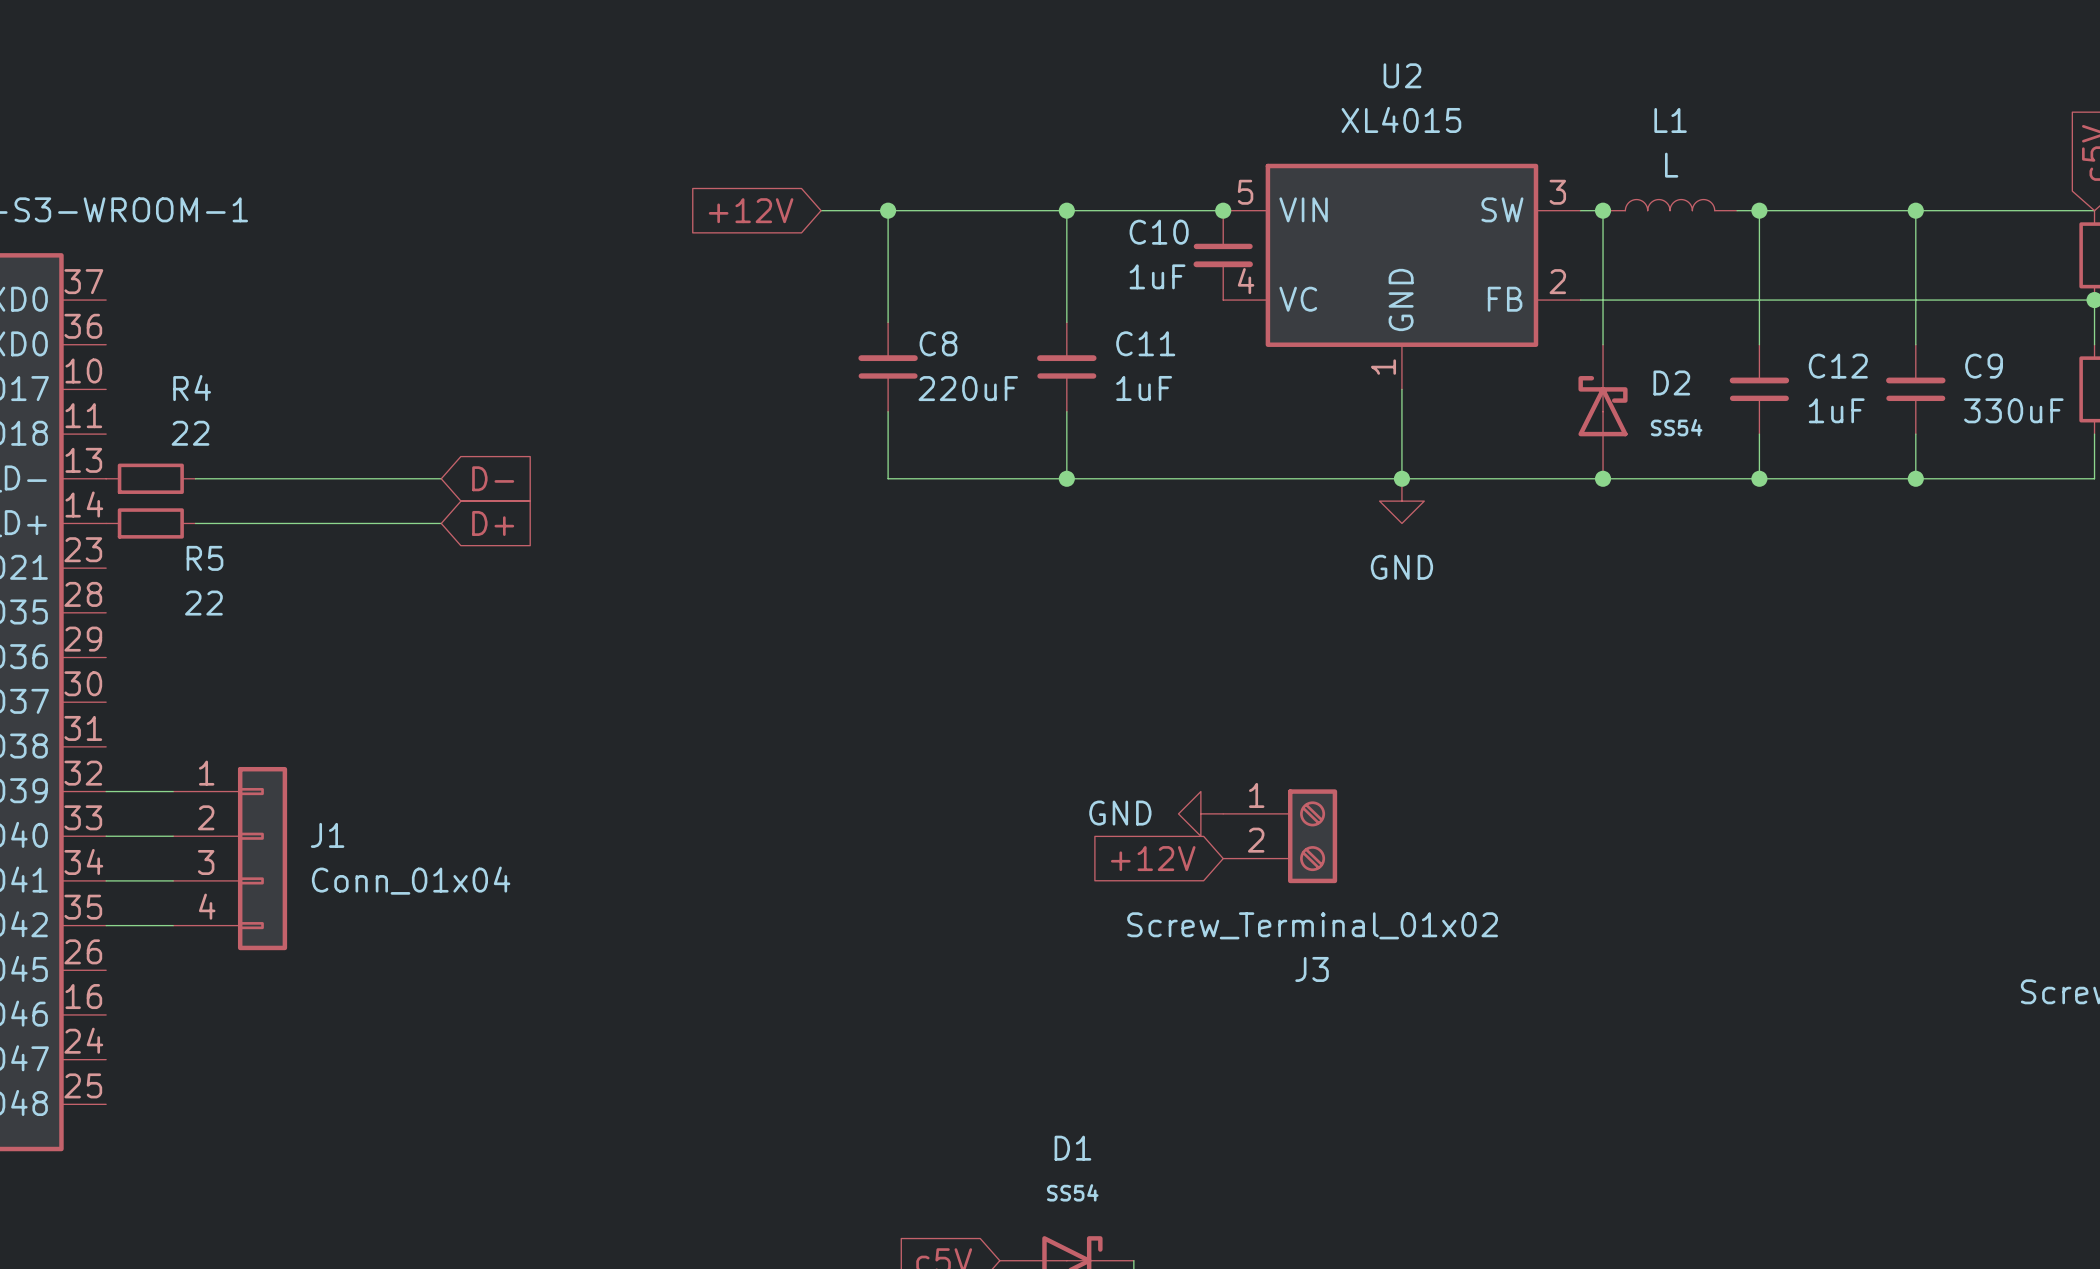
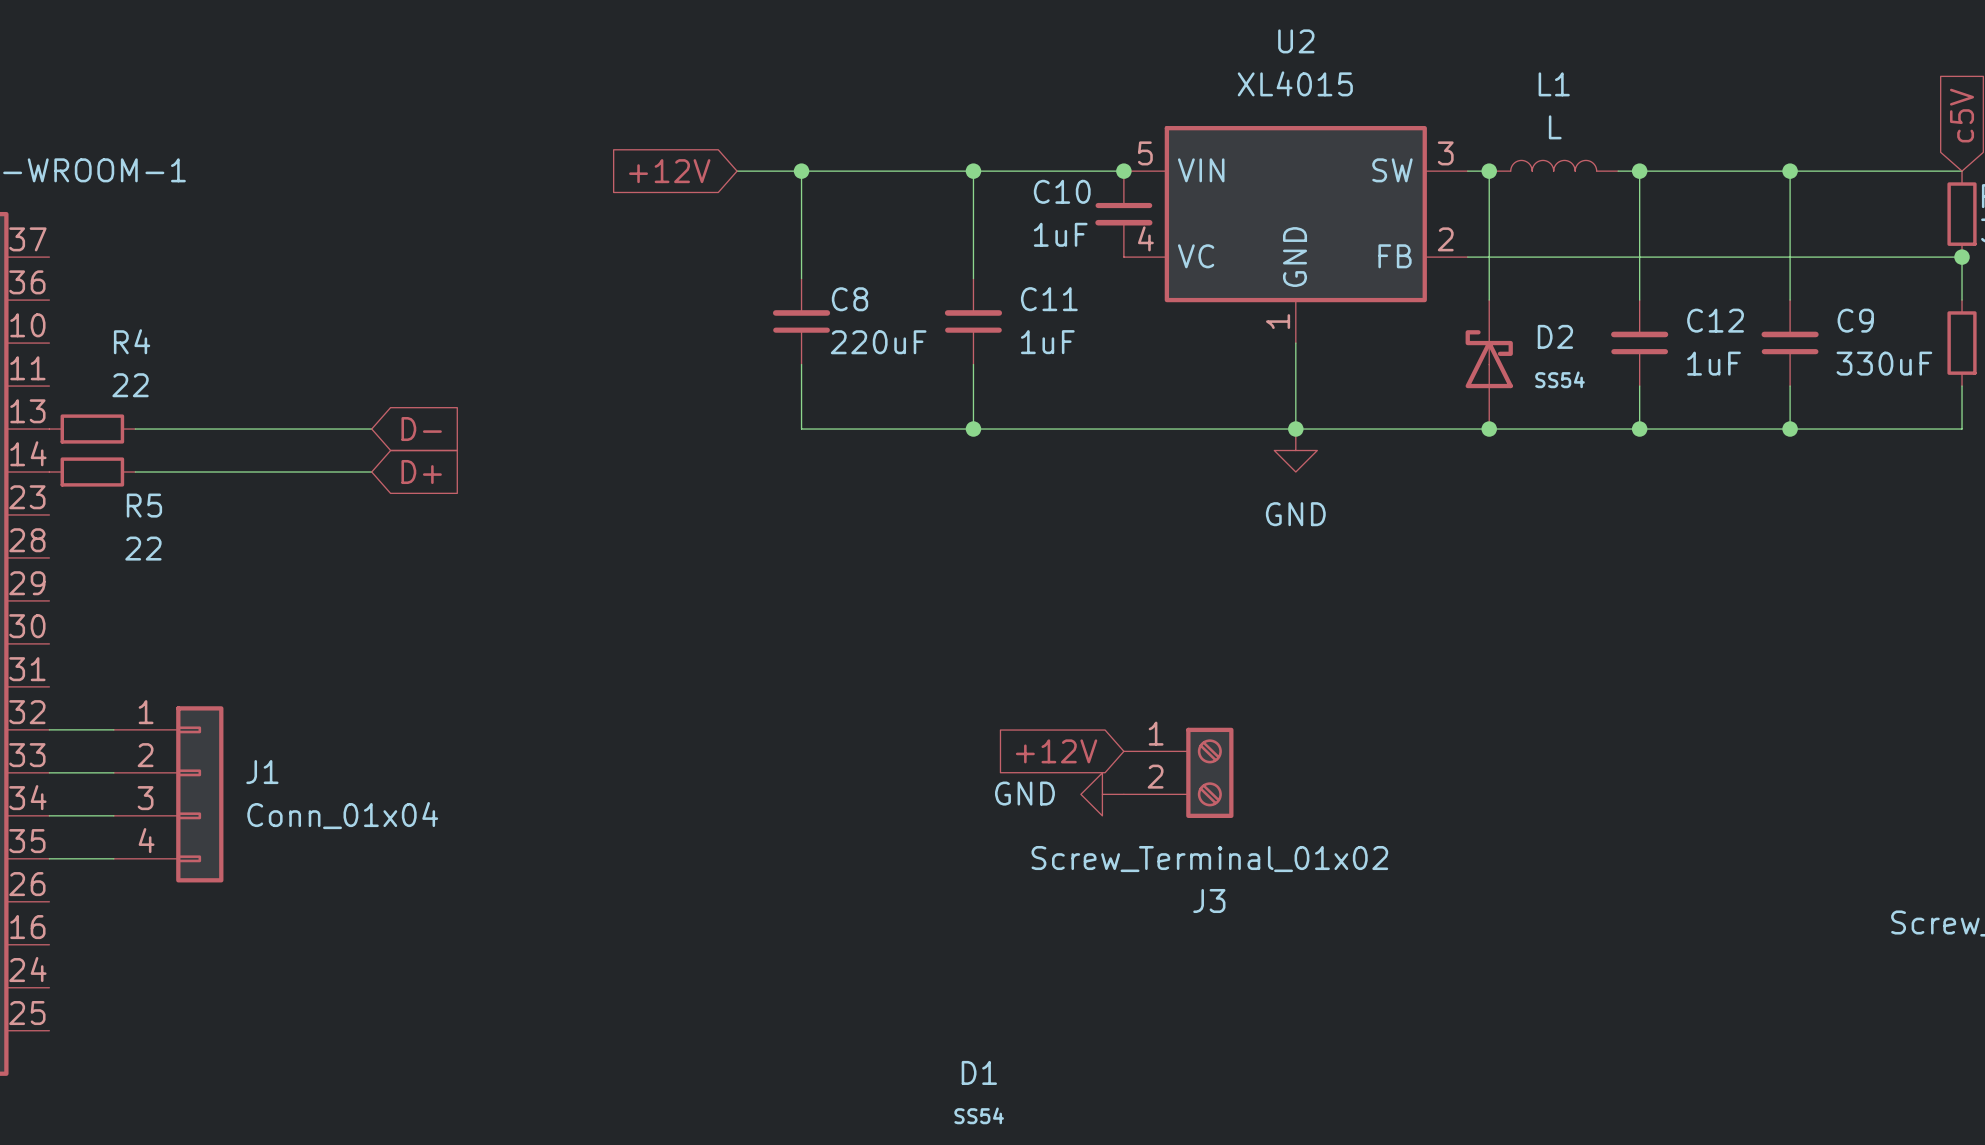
power symbol position: GND (1200, 813) -> GND (1102, 794)
global label position: +12V (1153, 858) -> +12V (1056, 751)

